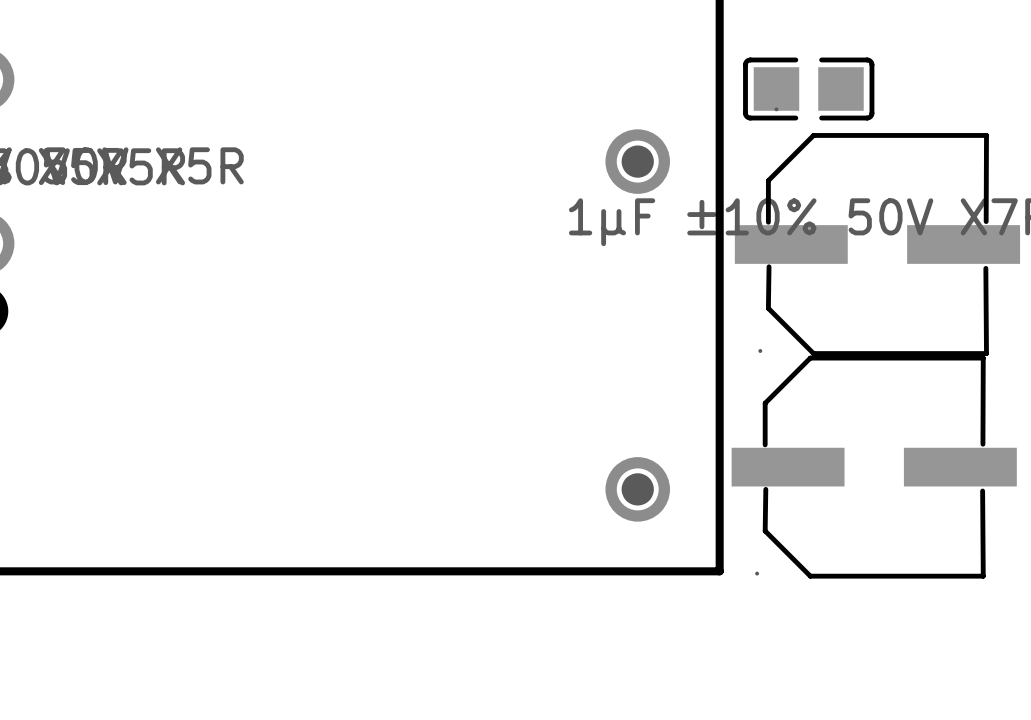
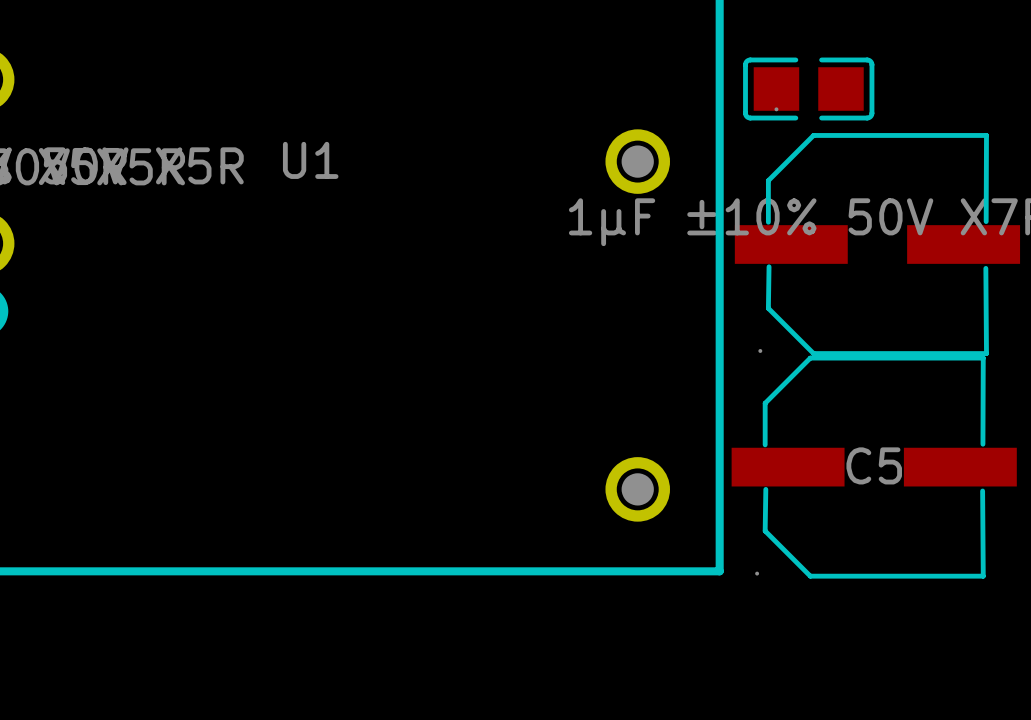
U1 name: none -> U1 (310, 160)
C5 name: none -> C5 (874, 465)

